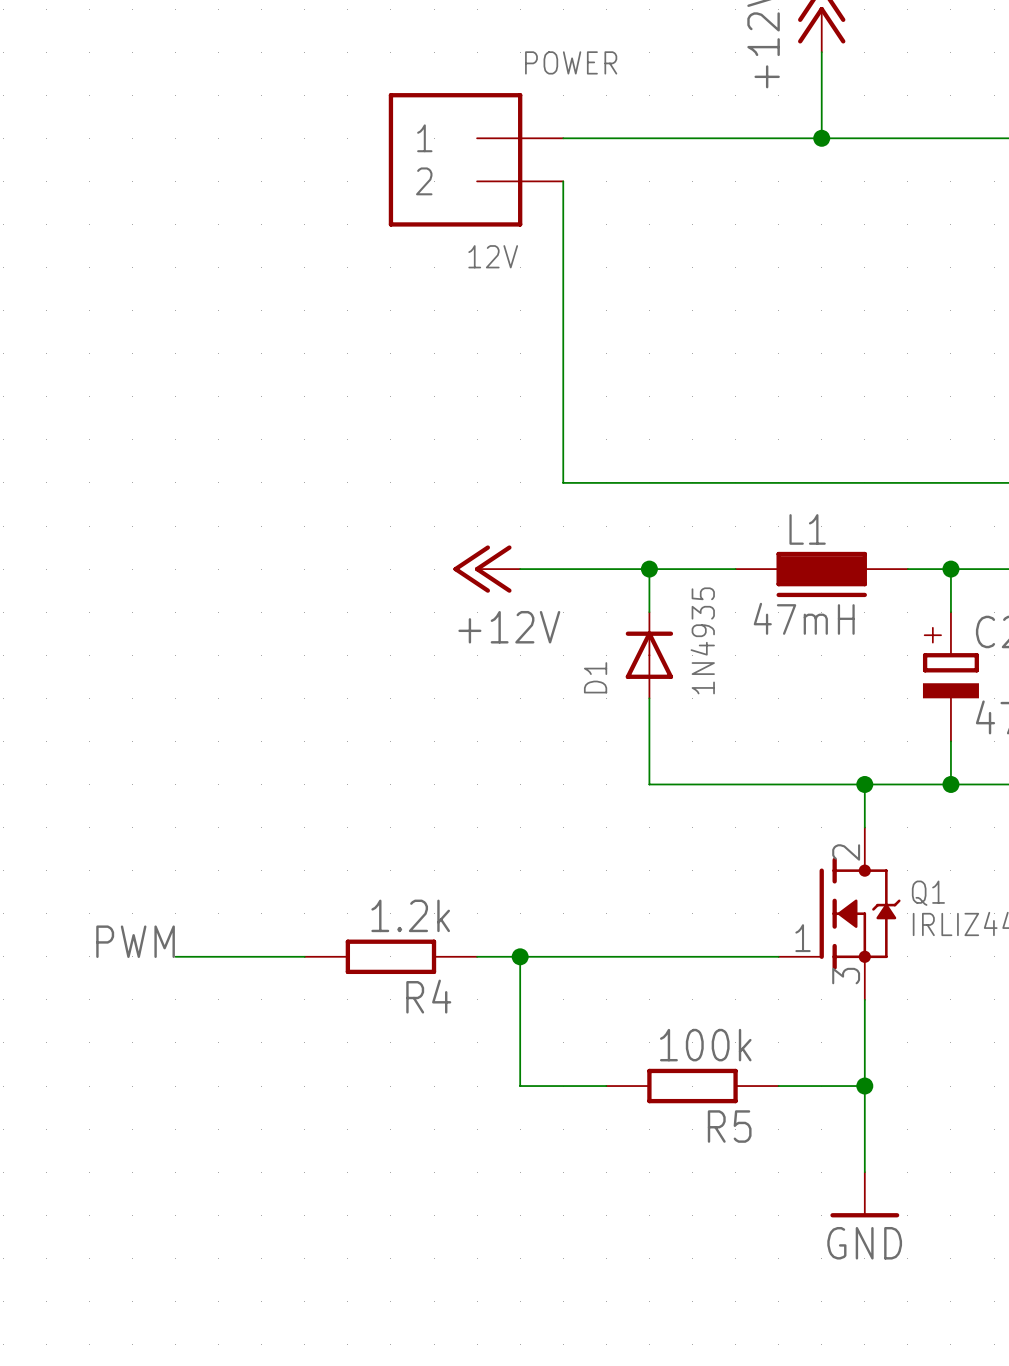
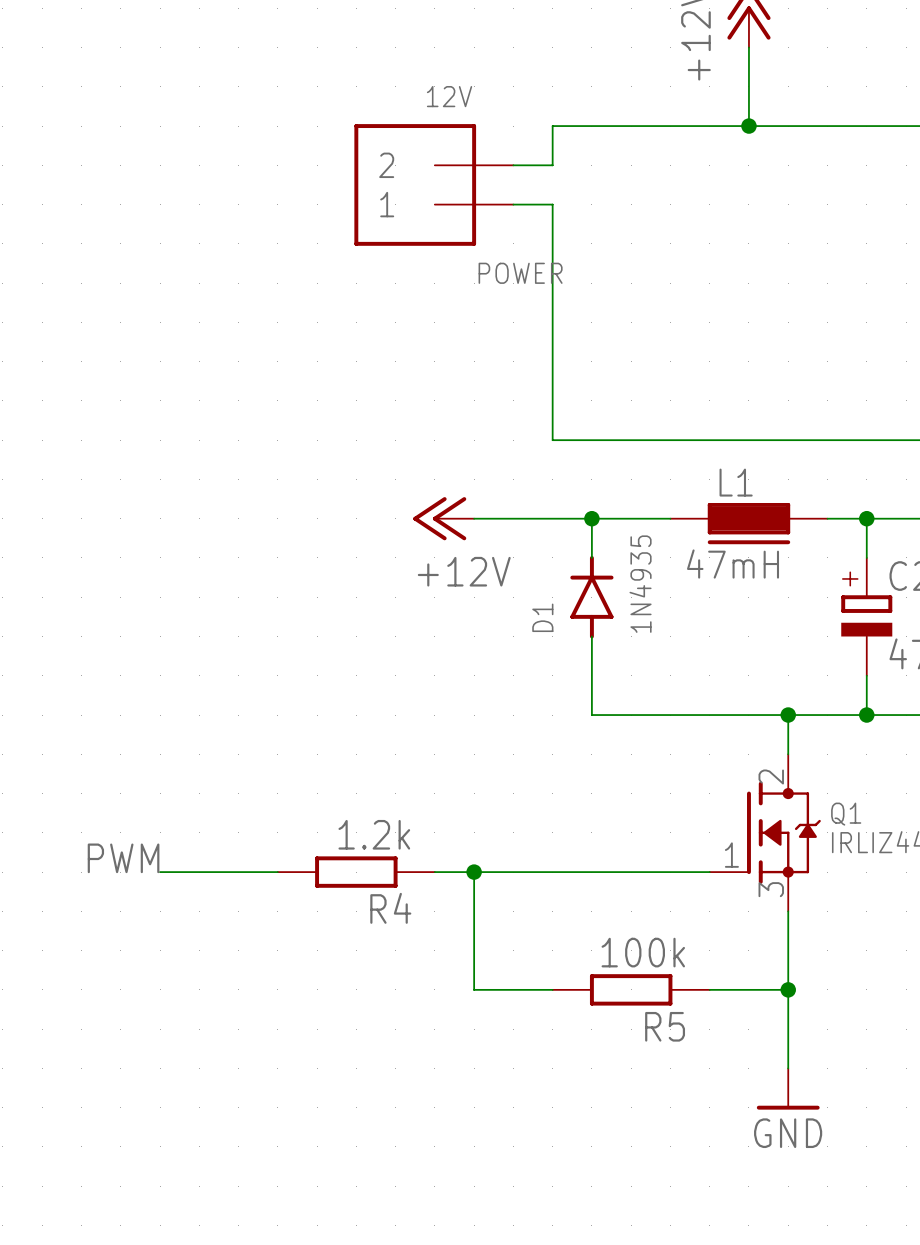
wire: (563, 138) (606, 138) -> (513, 165) (552, 165) (552, 126)
POWER: 12V (476, 159) -> none
wire: (563, 181) (563, 482) (606, 482) -> (513, 204) (552, 204) (552, 440)
POWER: none -> 12V (433, 184)
D1 symbol: [625, 612, 674, 699] -> [570, 556, 614, 639]

